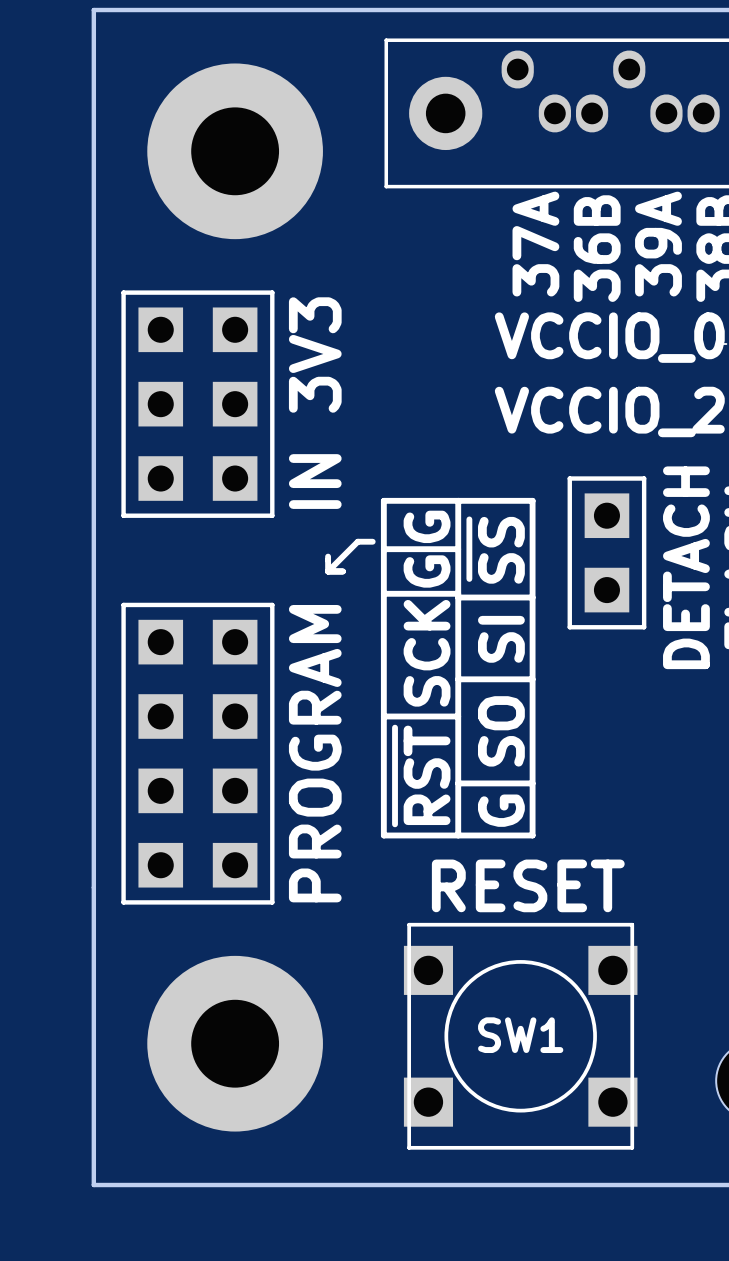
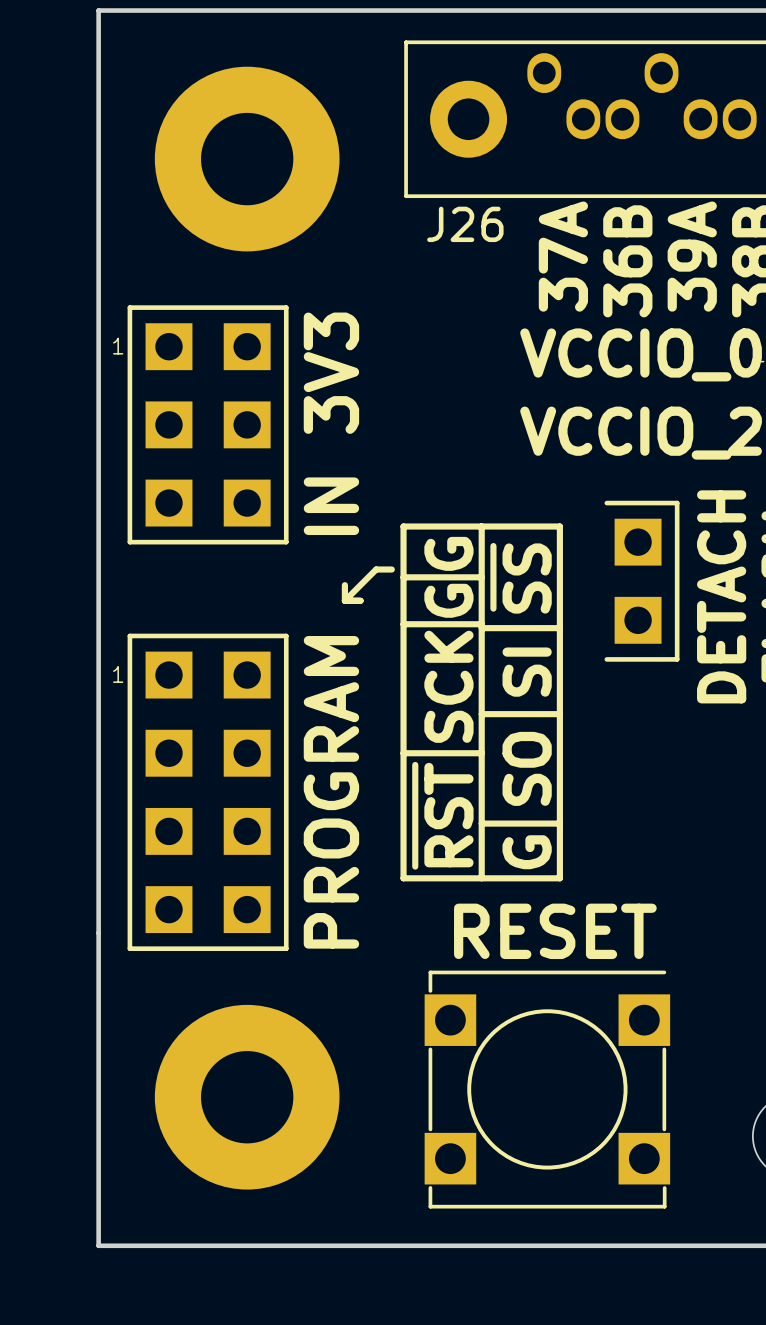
J26 name: none -> J26 (465, 224)
part text: none -> 1 (118, 346)
part footprint: [567, 476, 647, 630] -> [604, 500, 680, 662]
part text: none -> 1 (118, 674)
SW1: (520, 1036) -> none
part: none -> (547, 1089)

